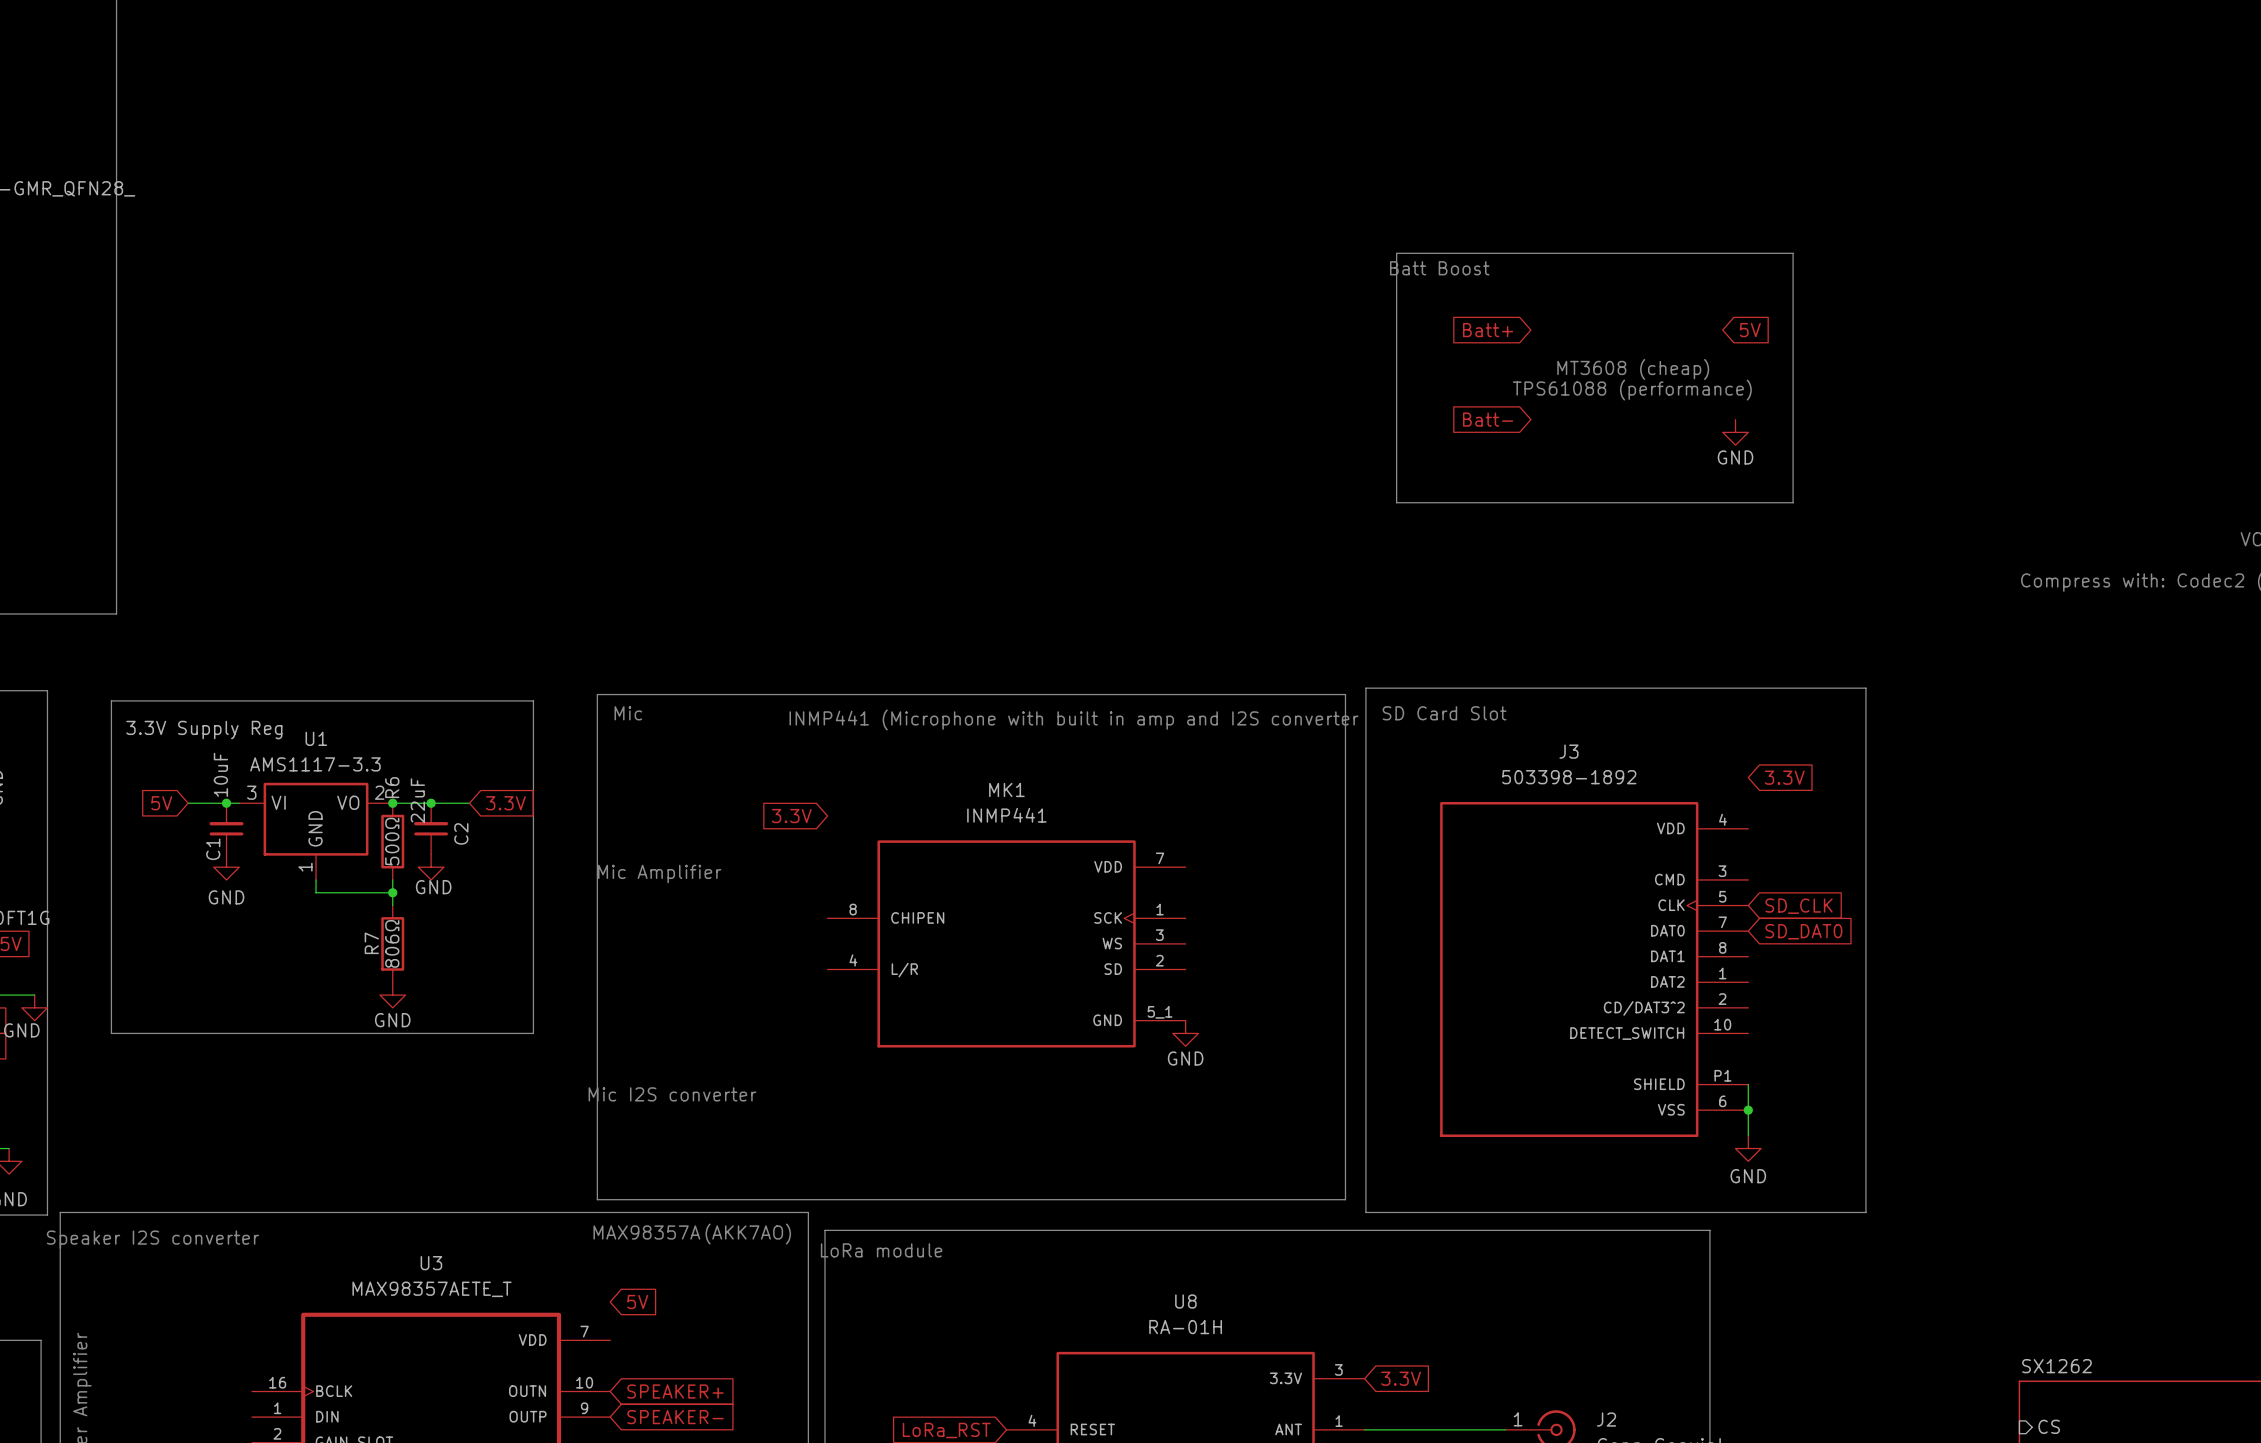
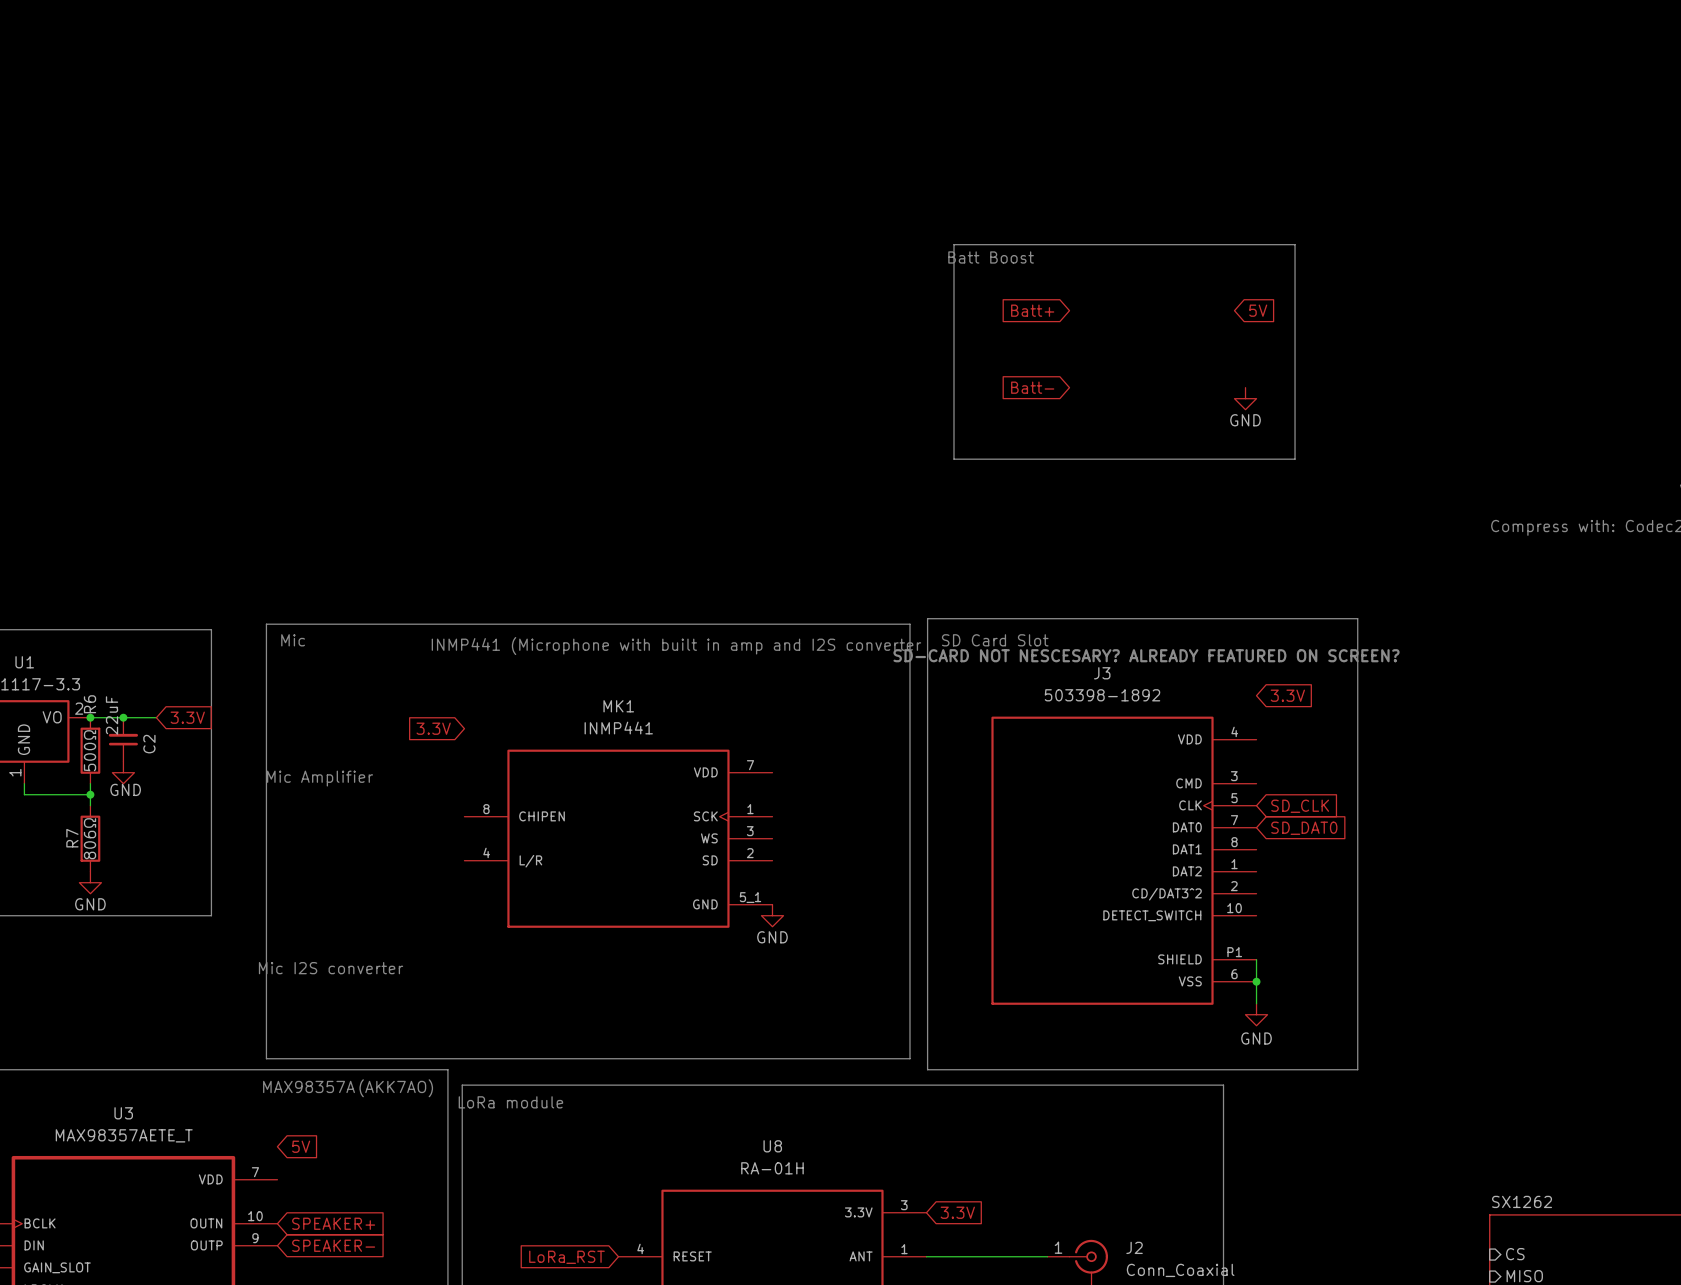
text: MT3608 (cheap) (1633, 369) -> none
text: TPS61088 (performance) (1632, 390) -> none
text: none -> SD-CARD NOT NESCESARY? ALREADY FEATURED ON SCREEN? (1146, 655)

